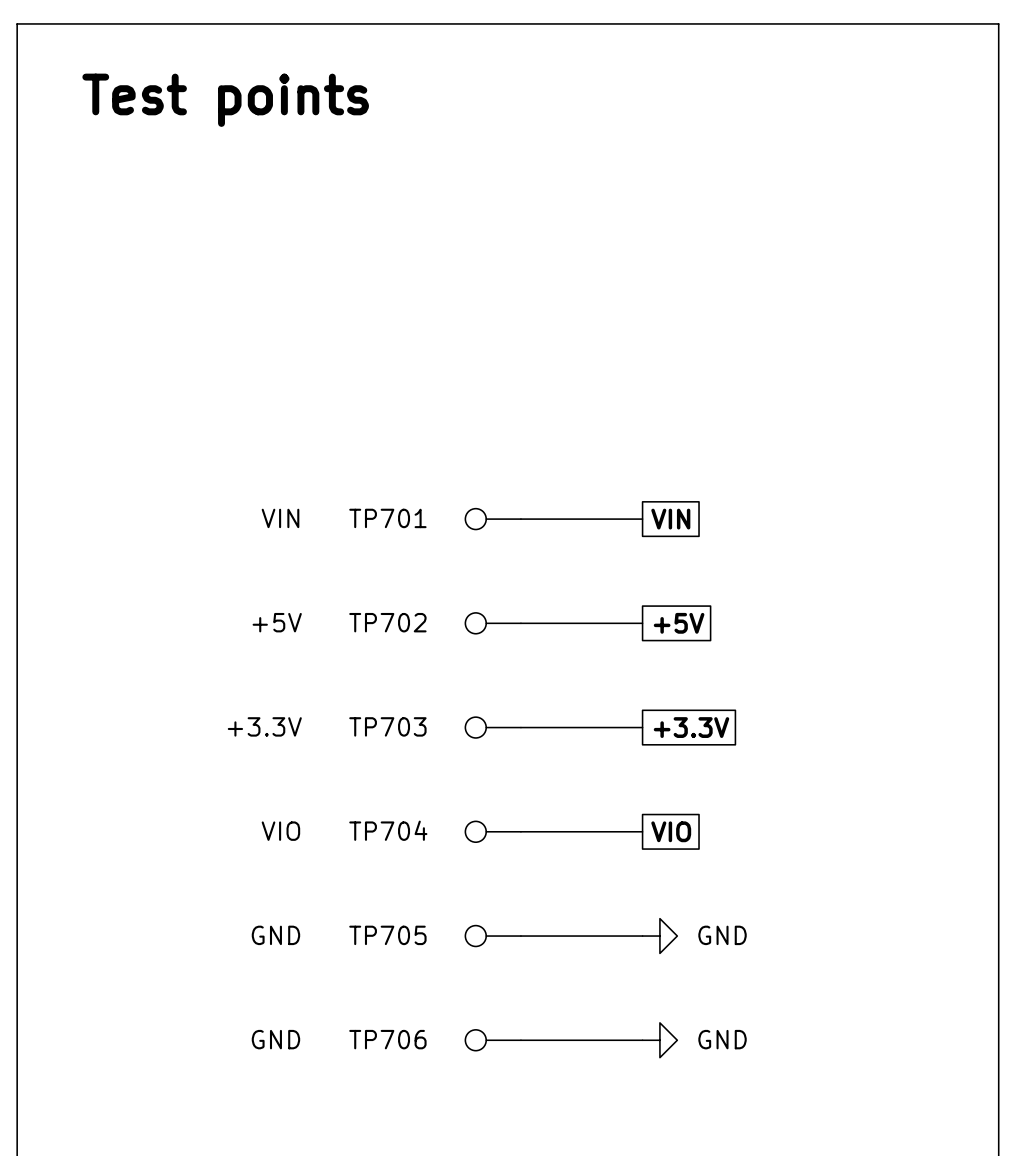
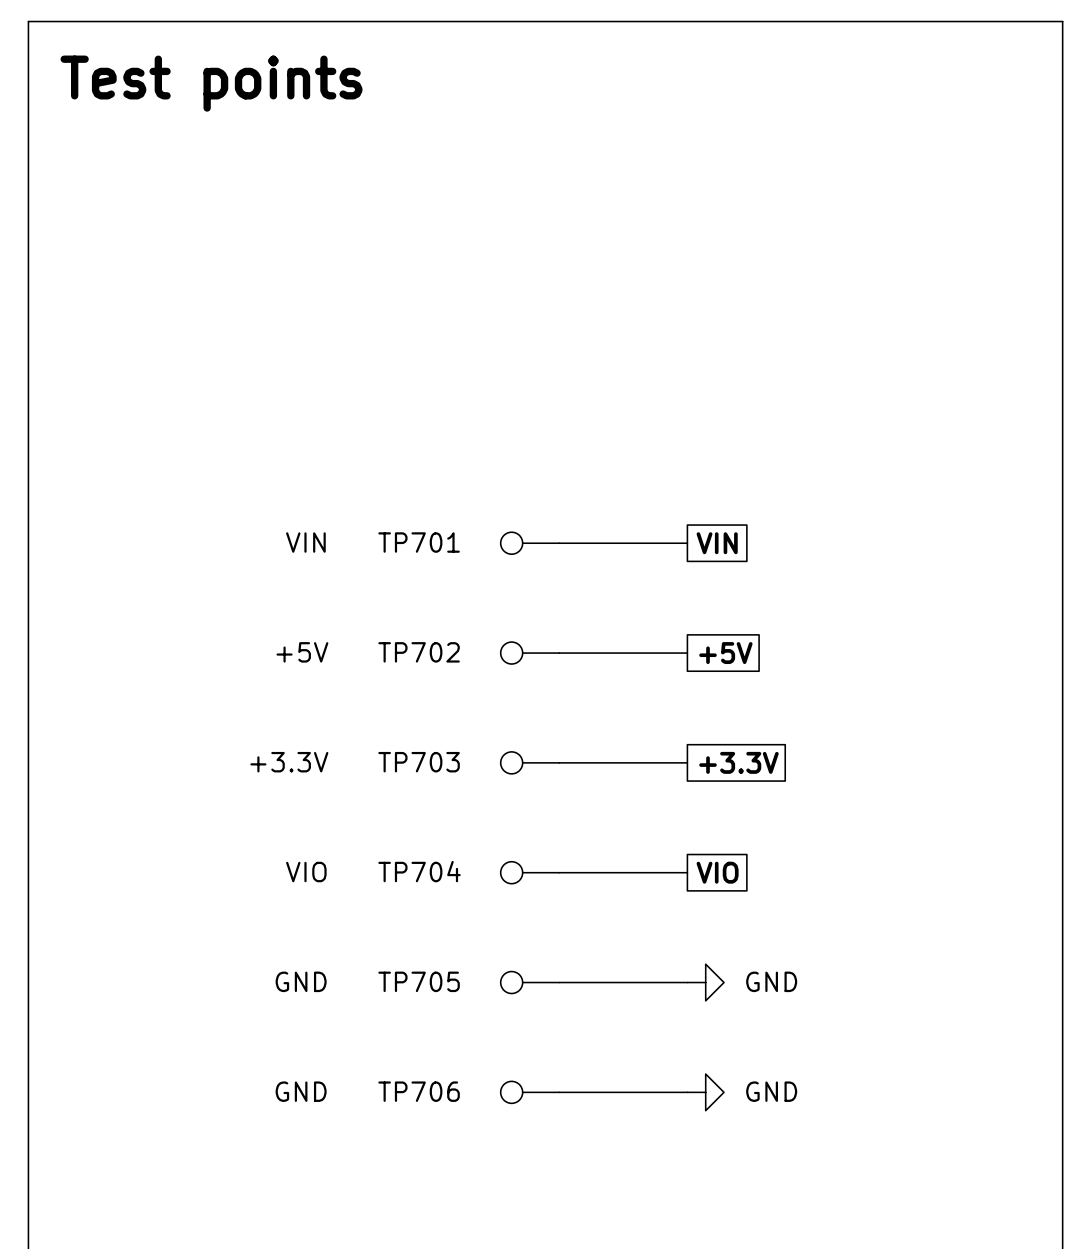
text position: Test points (225, 100) -> Test points (211, 83)

